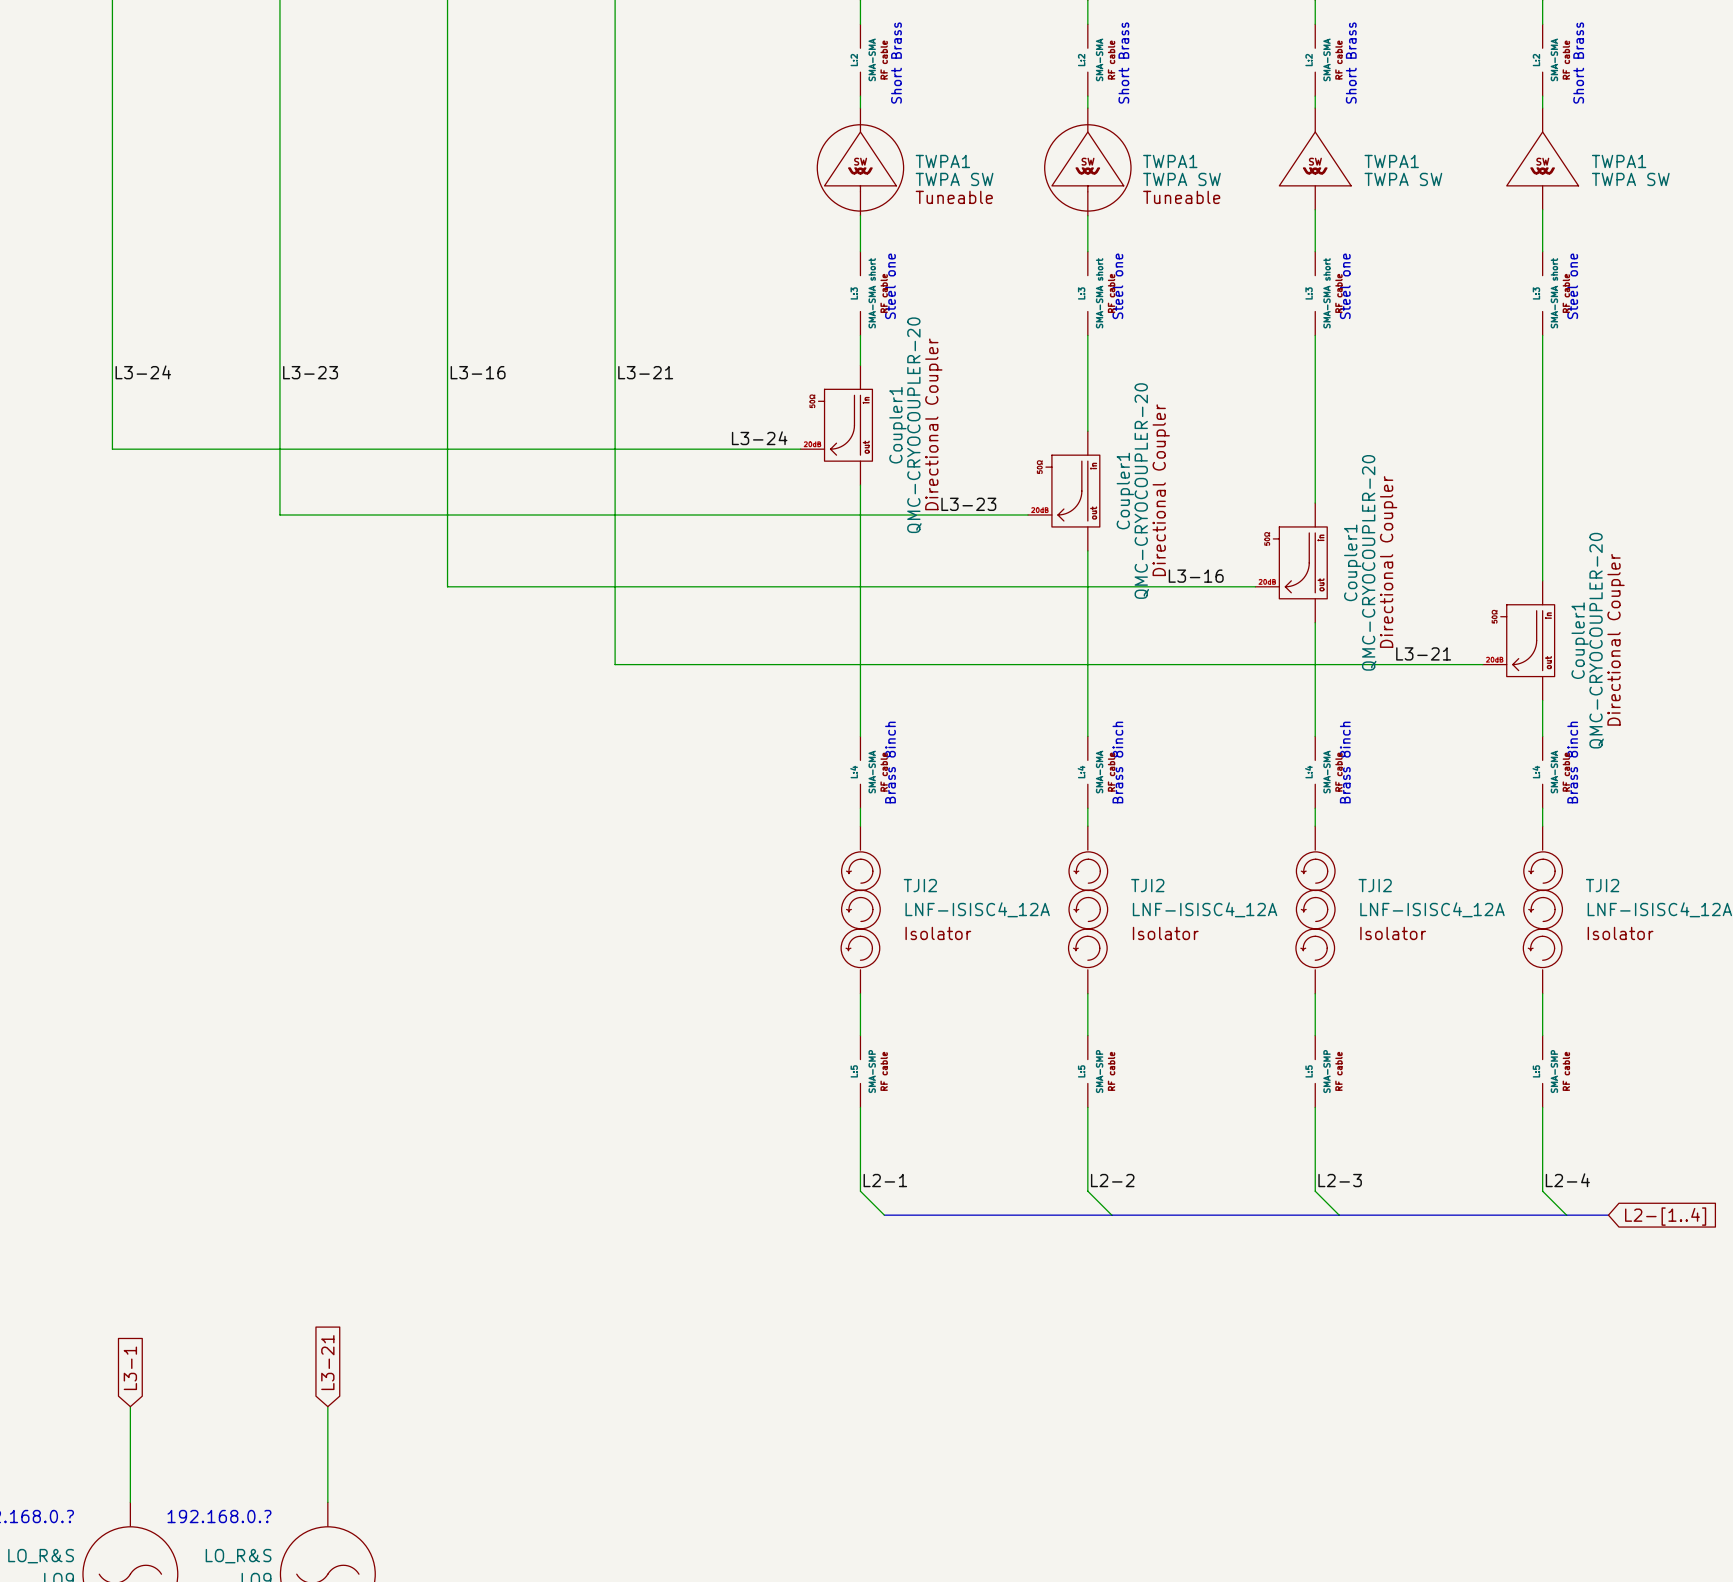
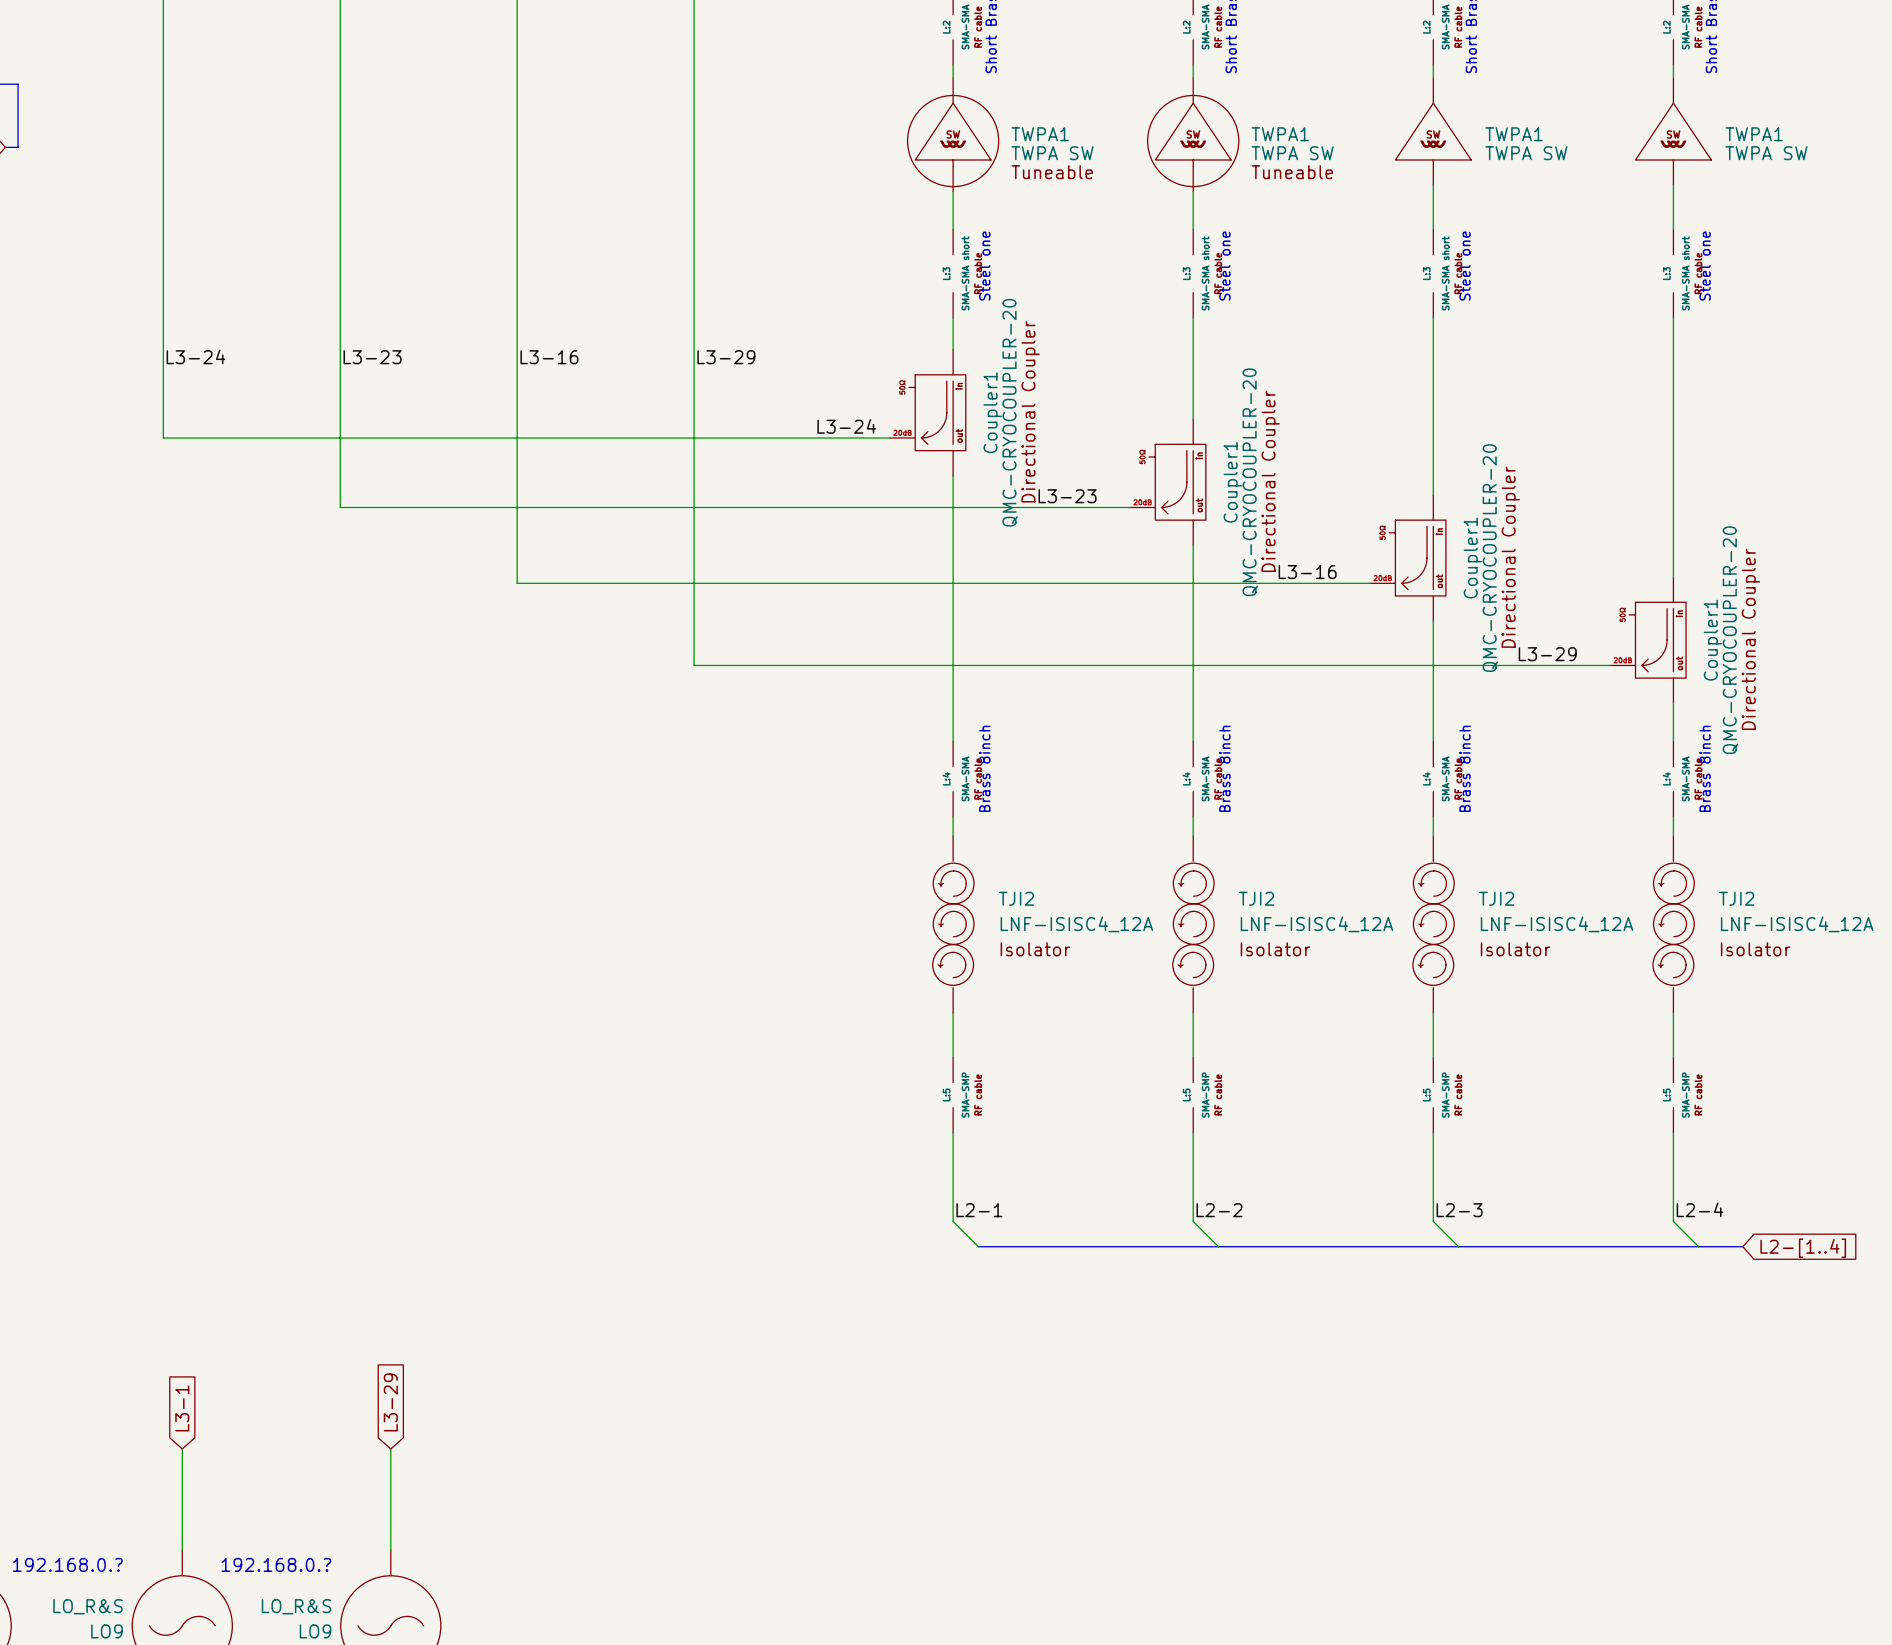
label: L3-21 (645, 372) -> L3-29 (726, 357)
label: L3-21 (1423, 653) -> L3-29 (1547, 654)
global label: L3-21 (327, 1362) -> L3-29 (390, 1402)

